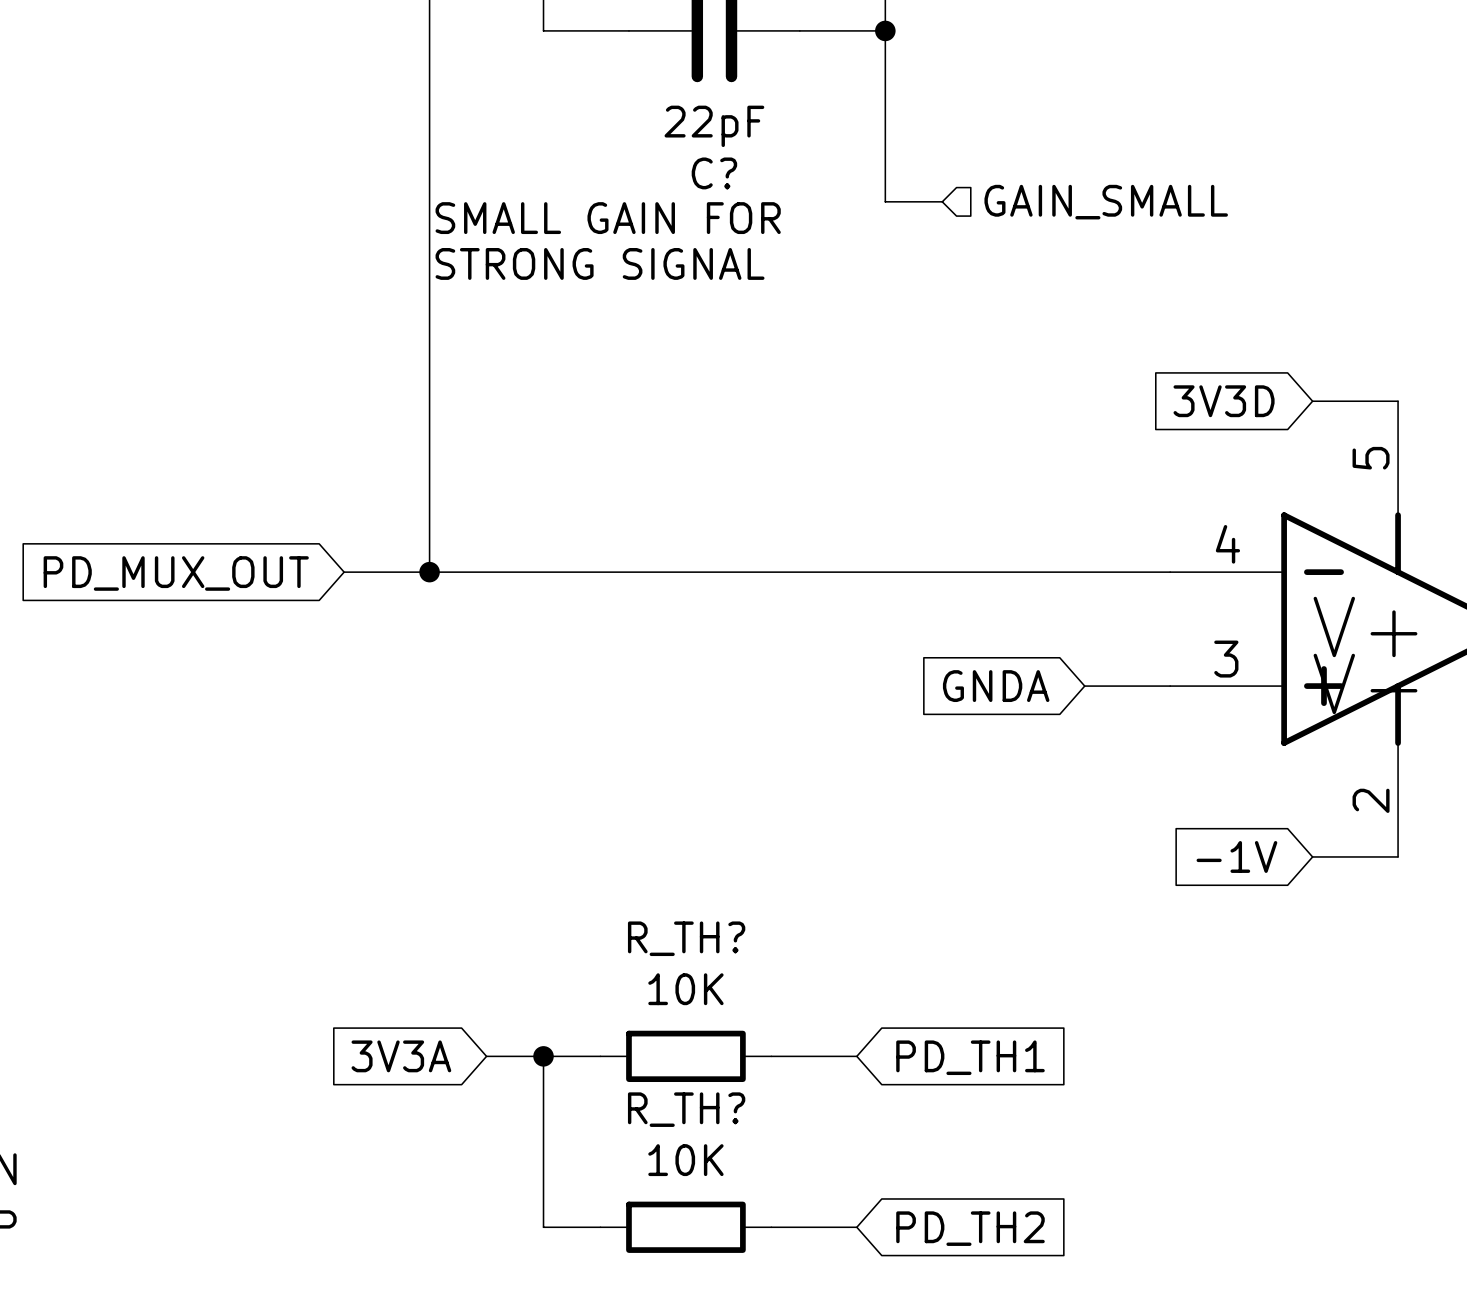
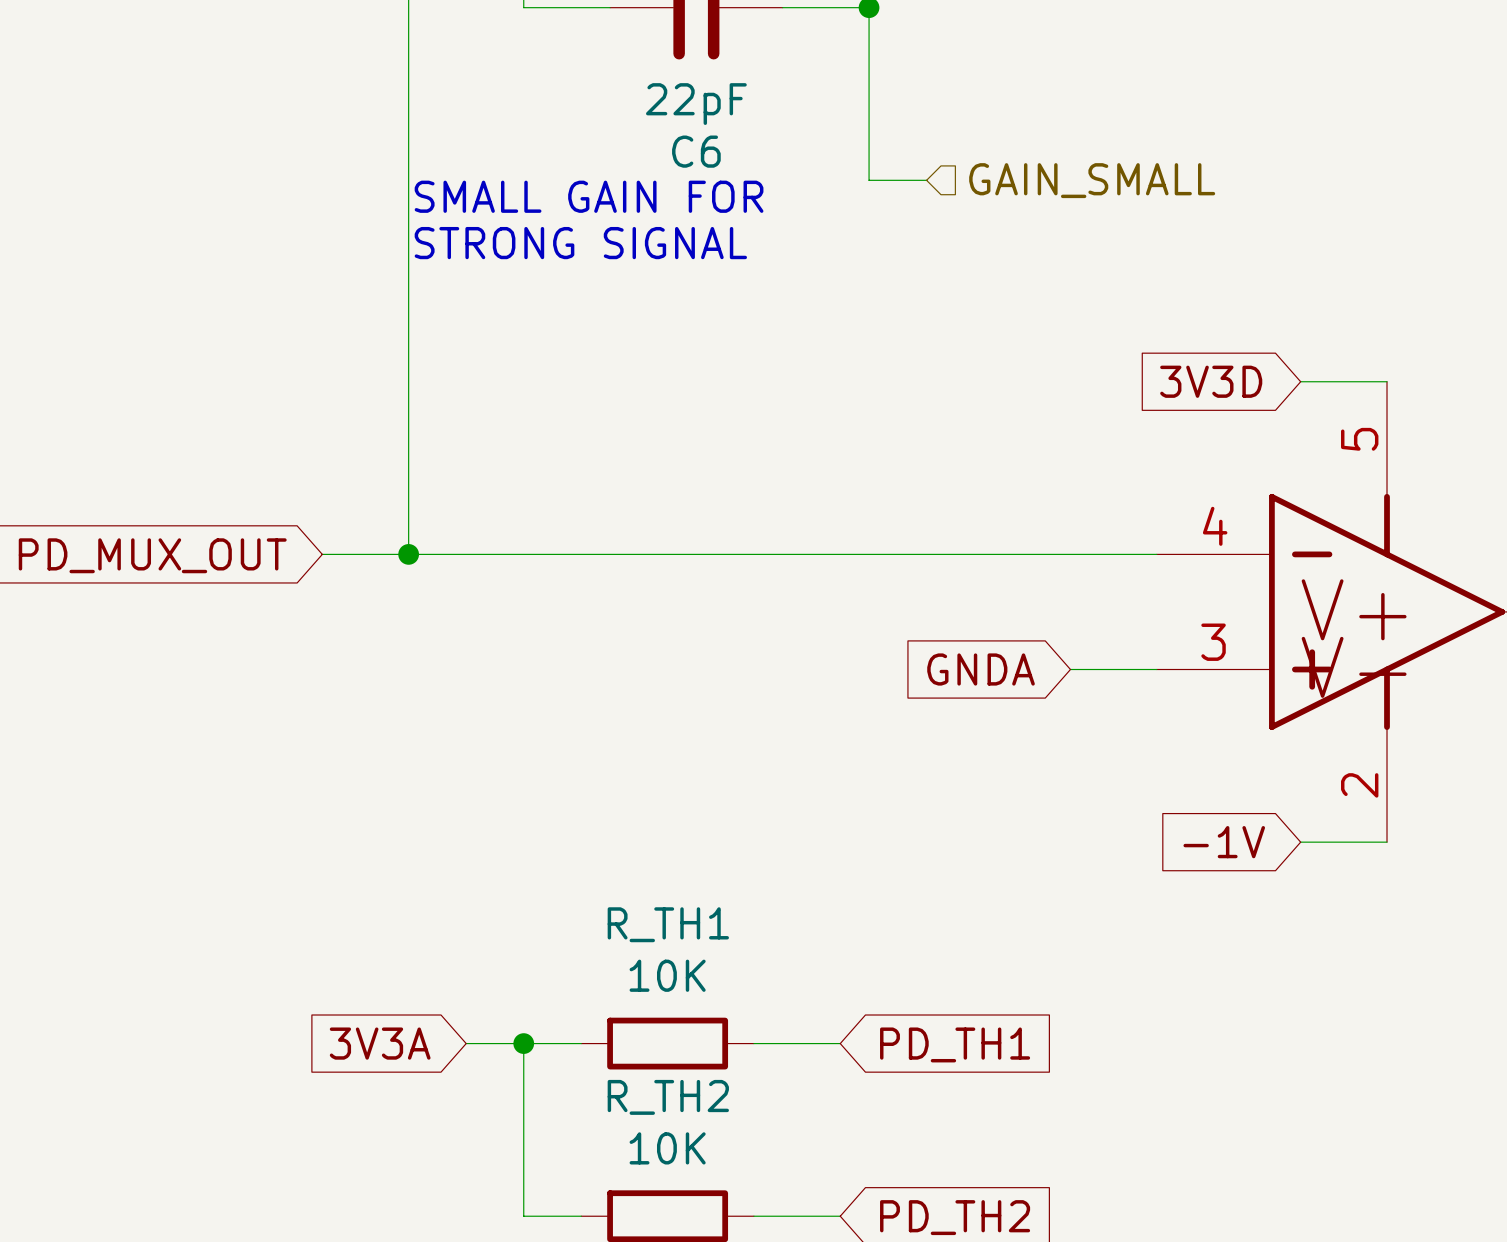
C? name: C? (714, 173) -> C6 (696, 151)
R_TH? name: R_TH? (686, 938) -> R_TH1 (668, 924)
R_TH? name: R_TH? (686, 1109) -> R_TH2 (668, 1097)

